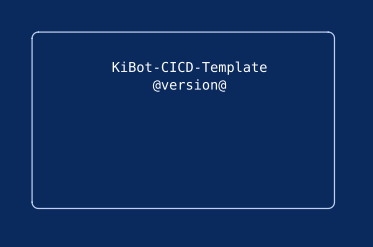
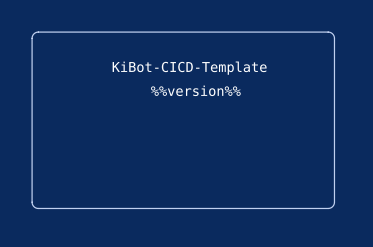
text: @version@ (189, 85) -> %%version%% (195, 90)

